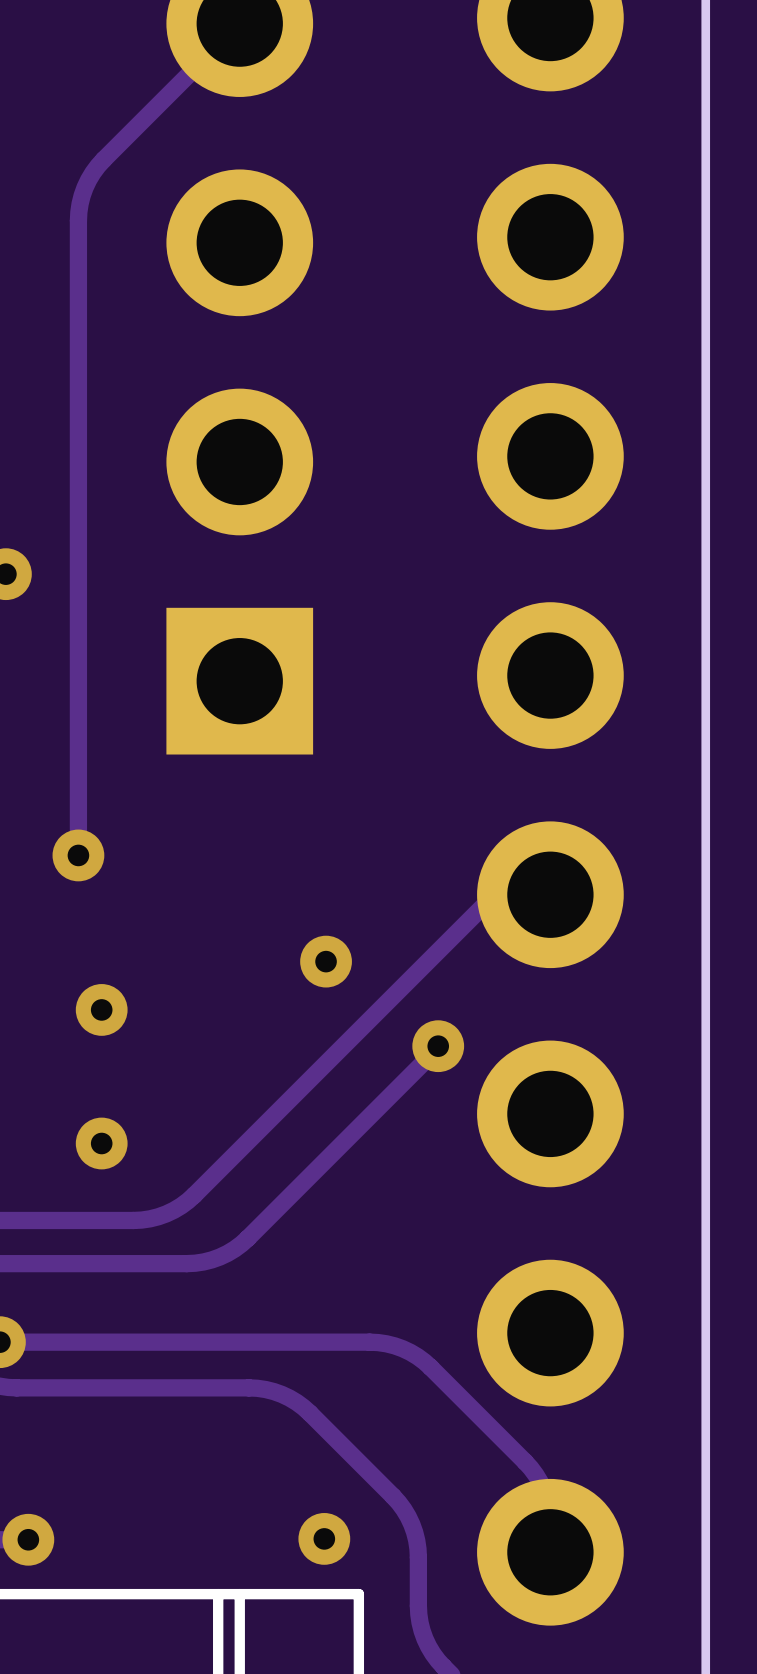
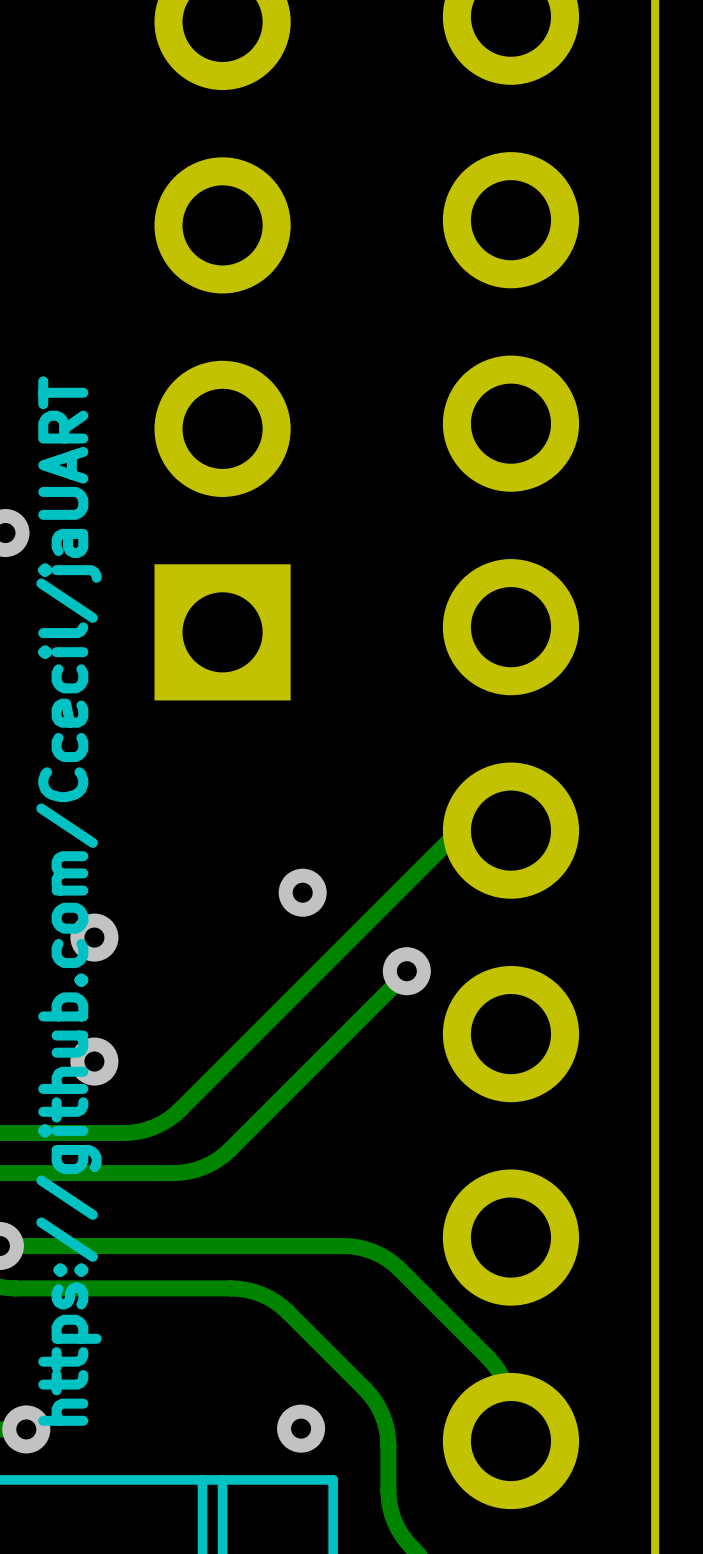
track: (239, 23) (98, 165) (88, 180) (80, 203) (78, 220) (78, 855) -> none
via: (78, 855) -> none
text: none -> https://github.com/Ccecil/jaUART (68, 901)

